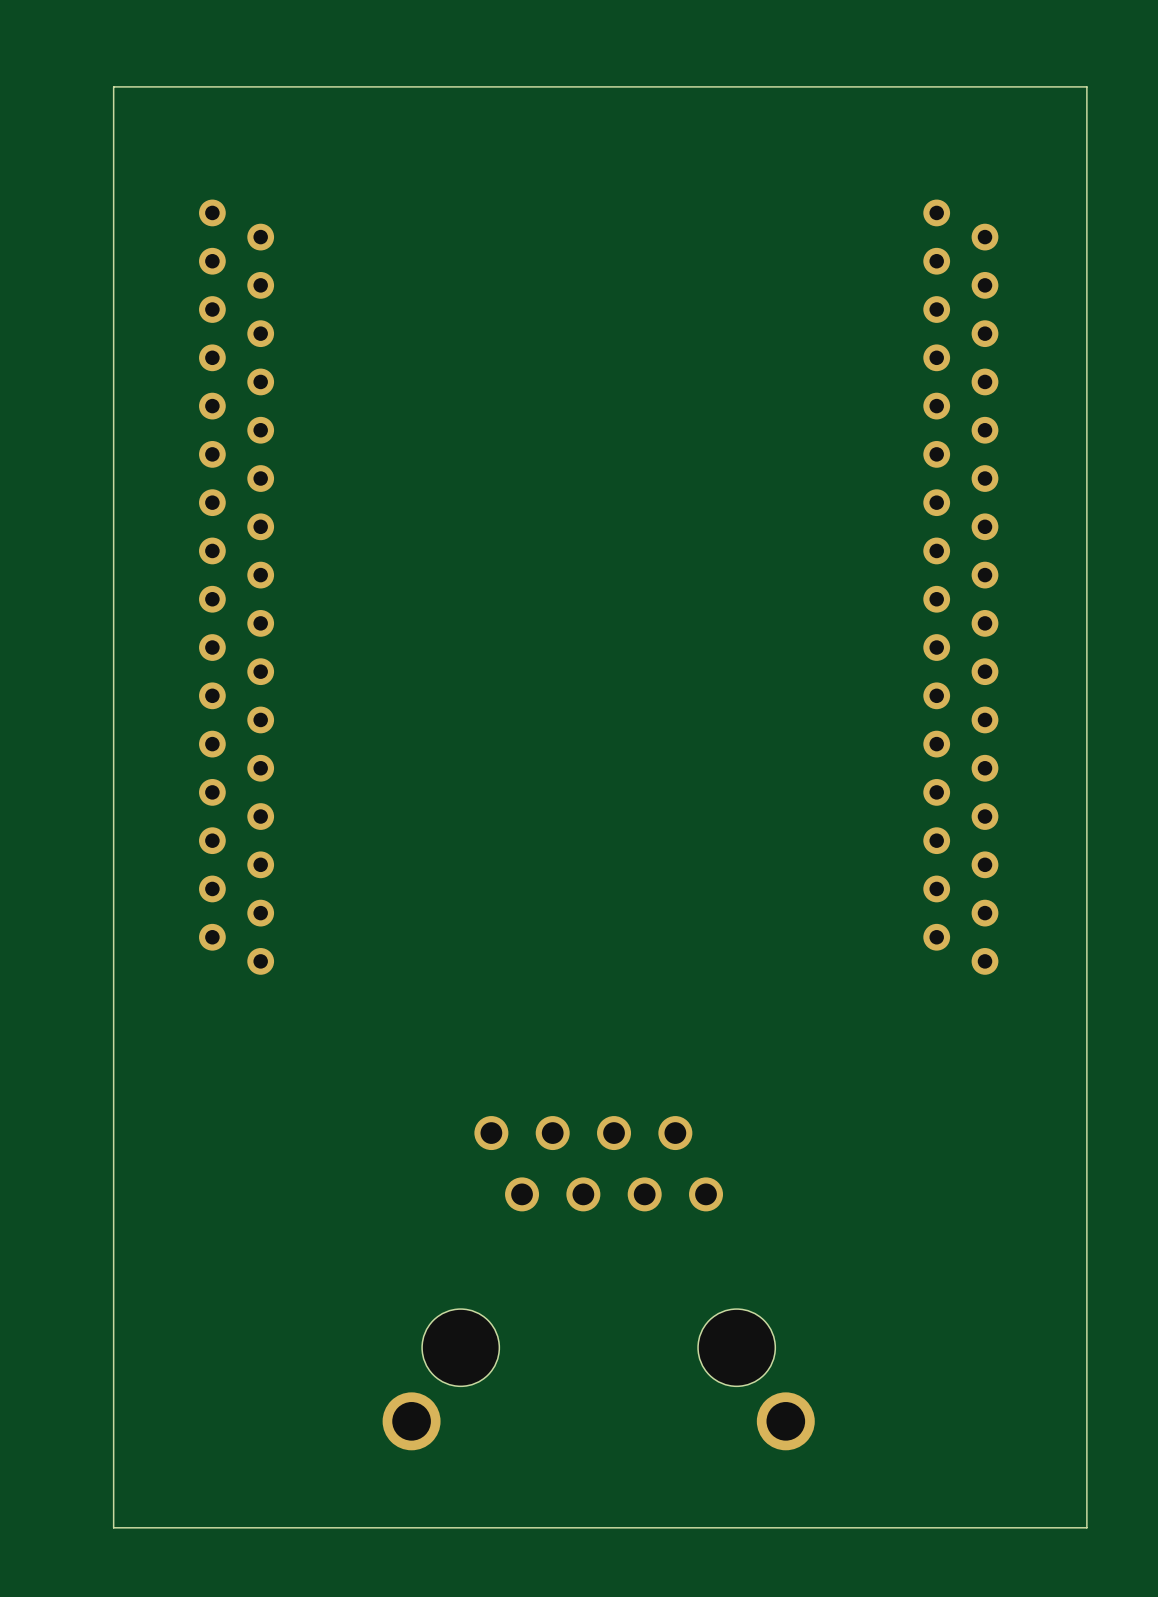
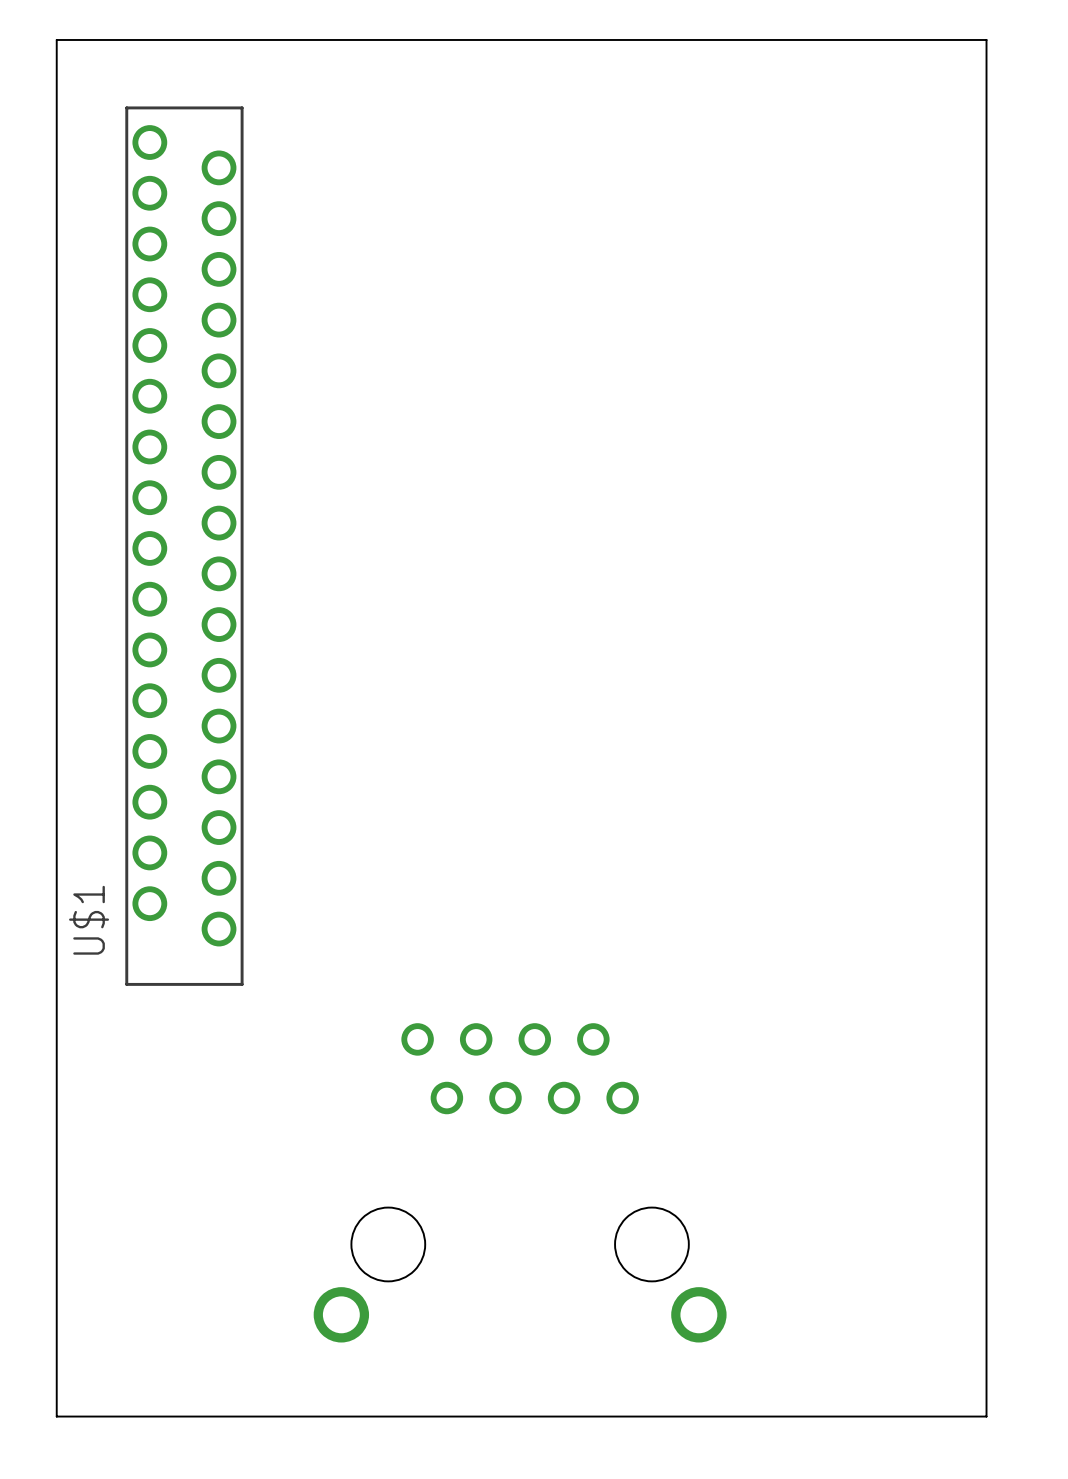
part: (236, 587) -> none
part: (960, 587) -> none
U$1: none -> (184, 546)

